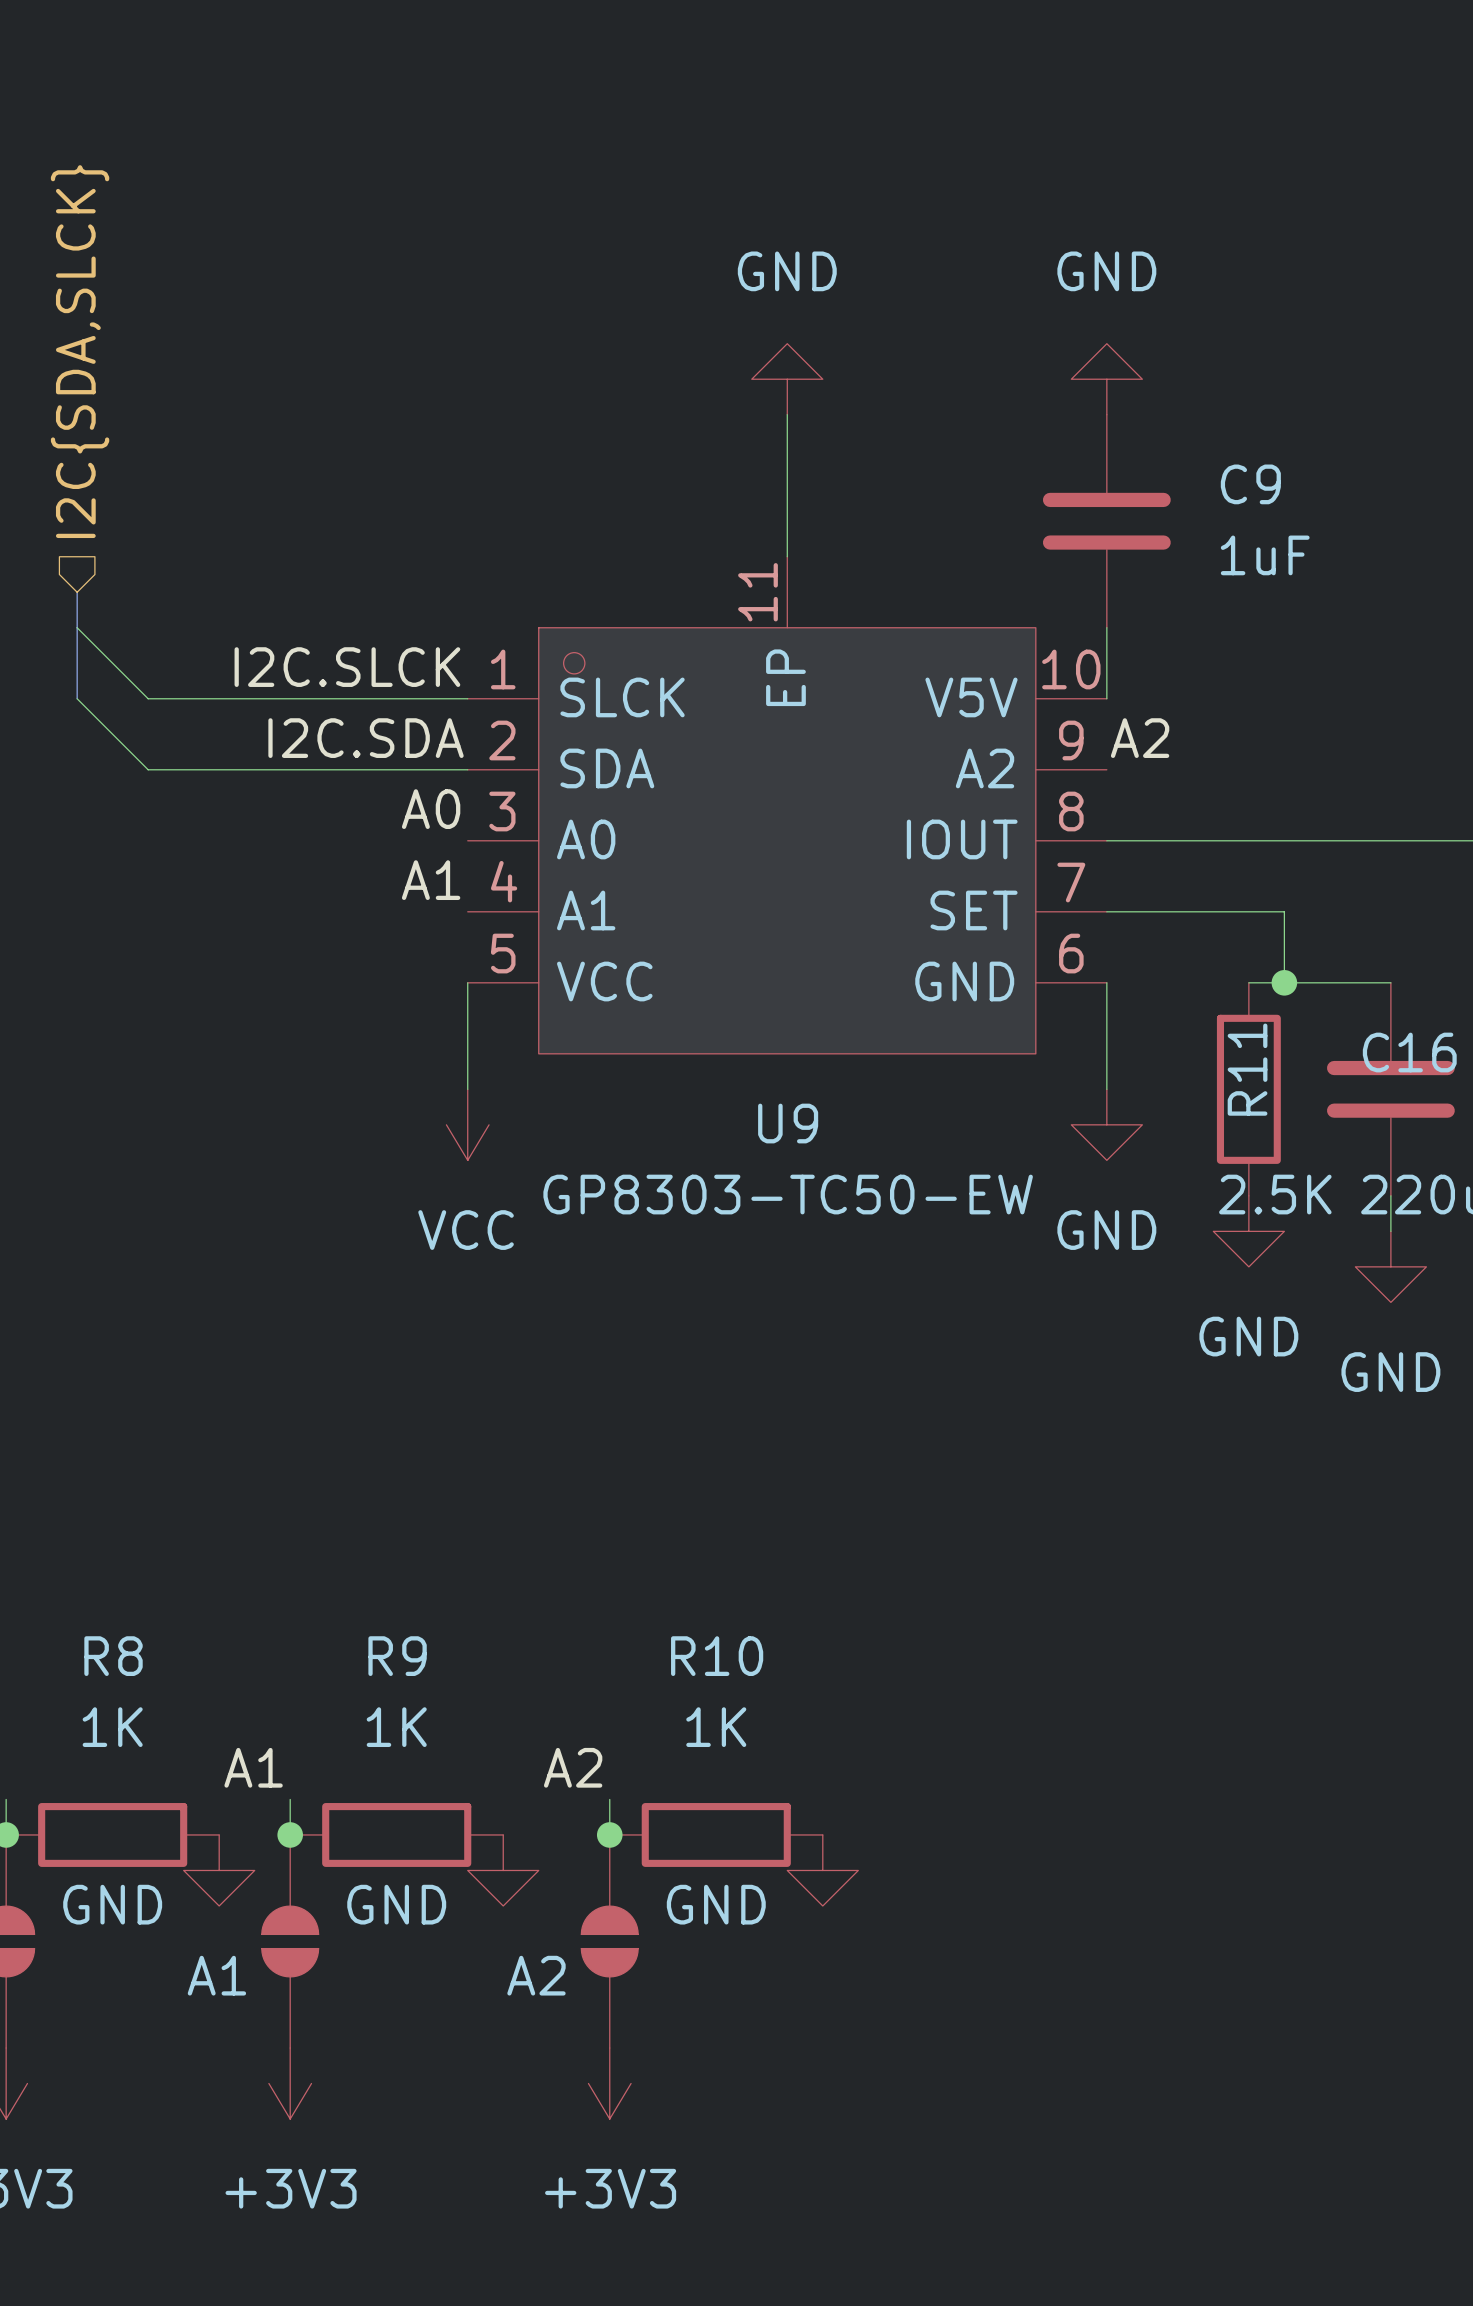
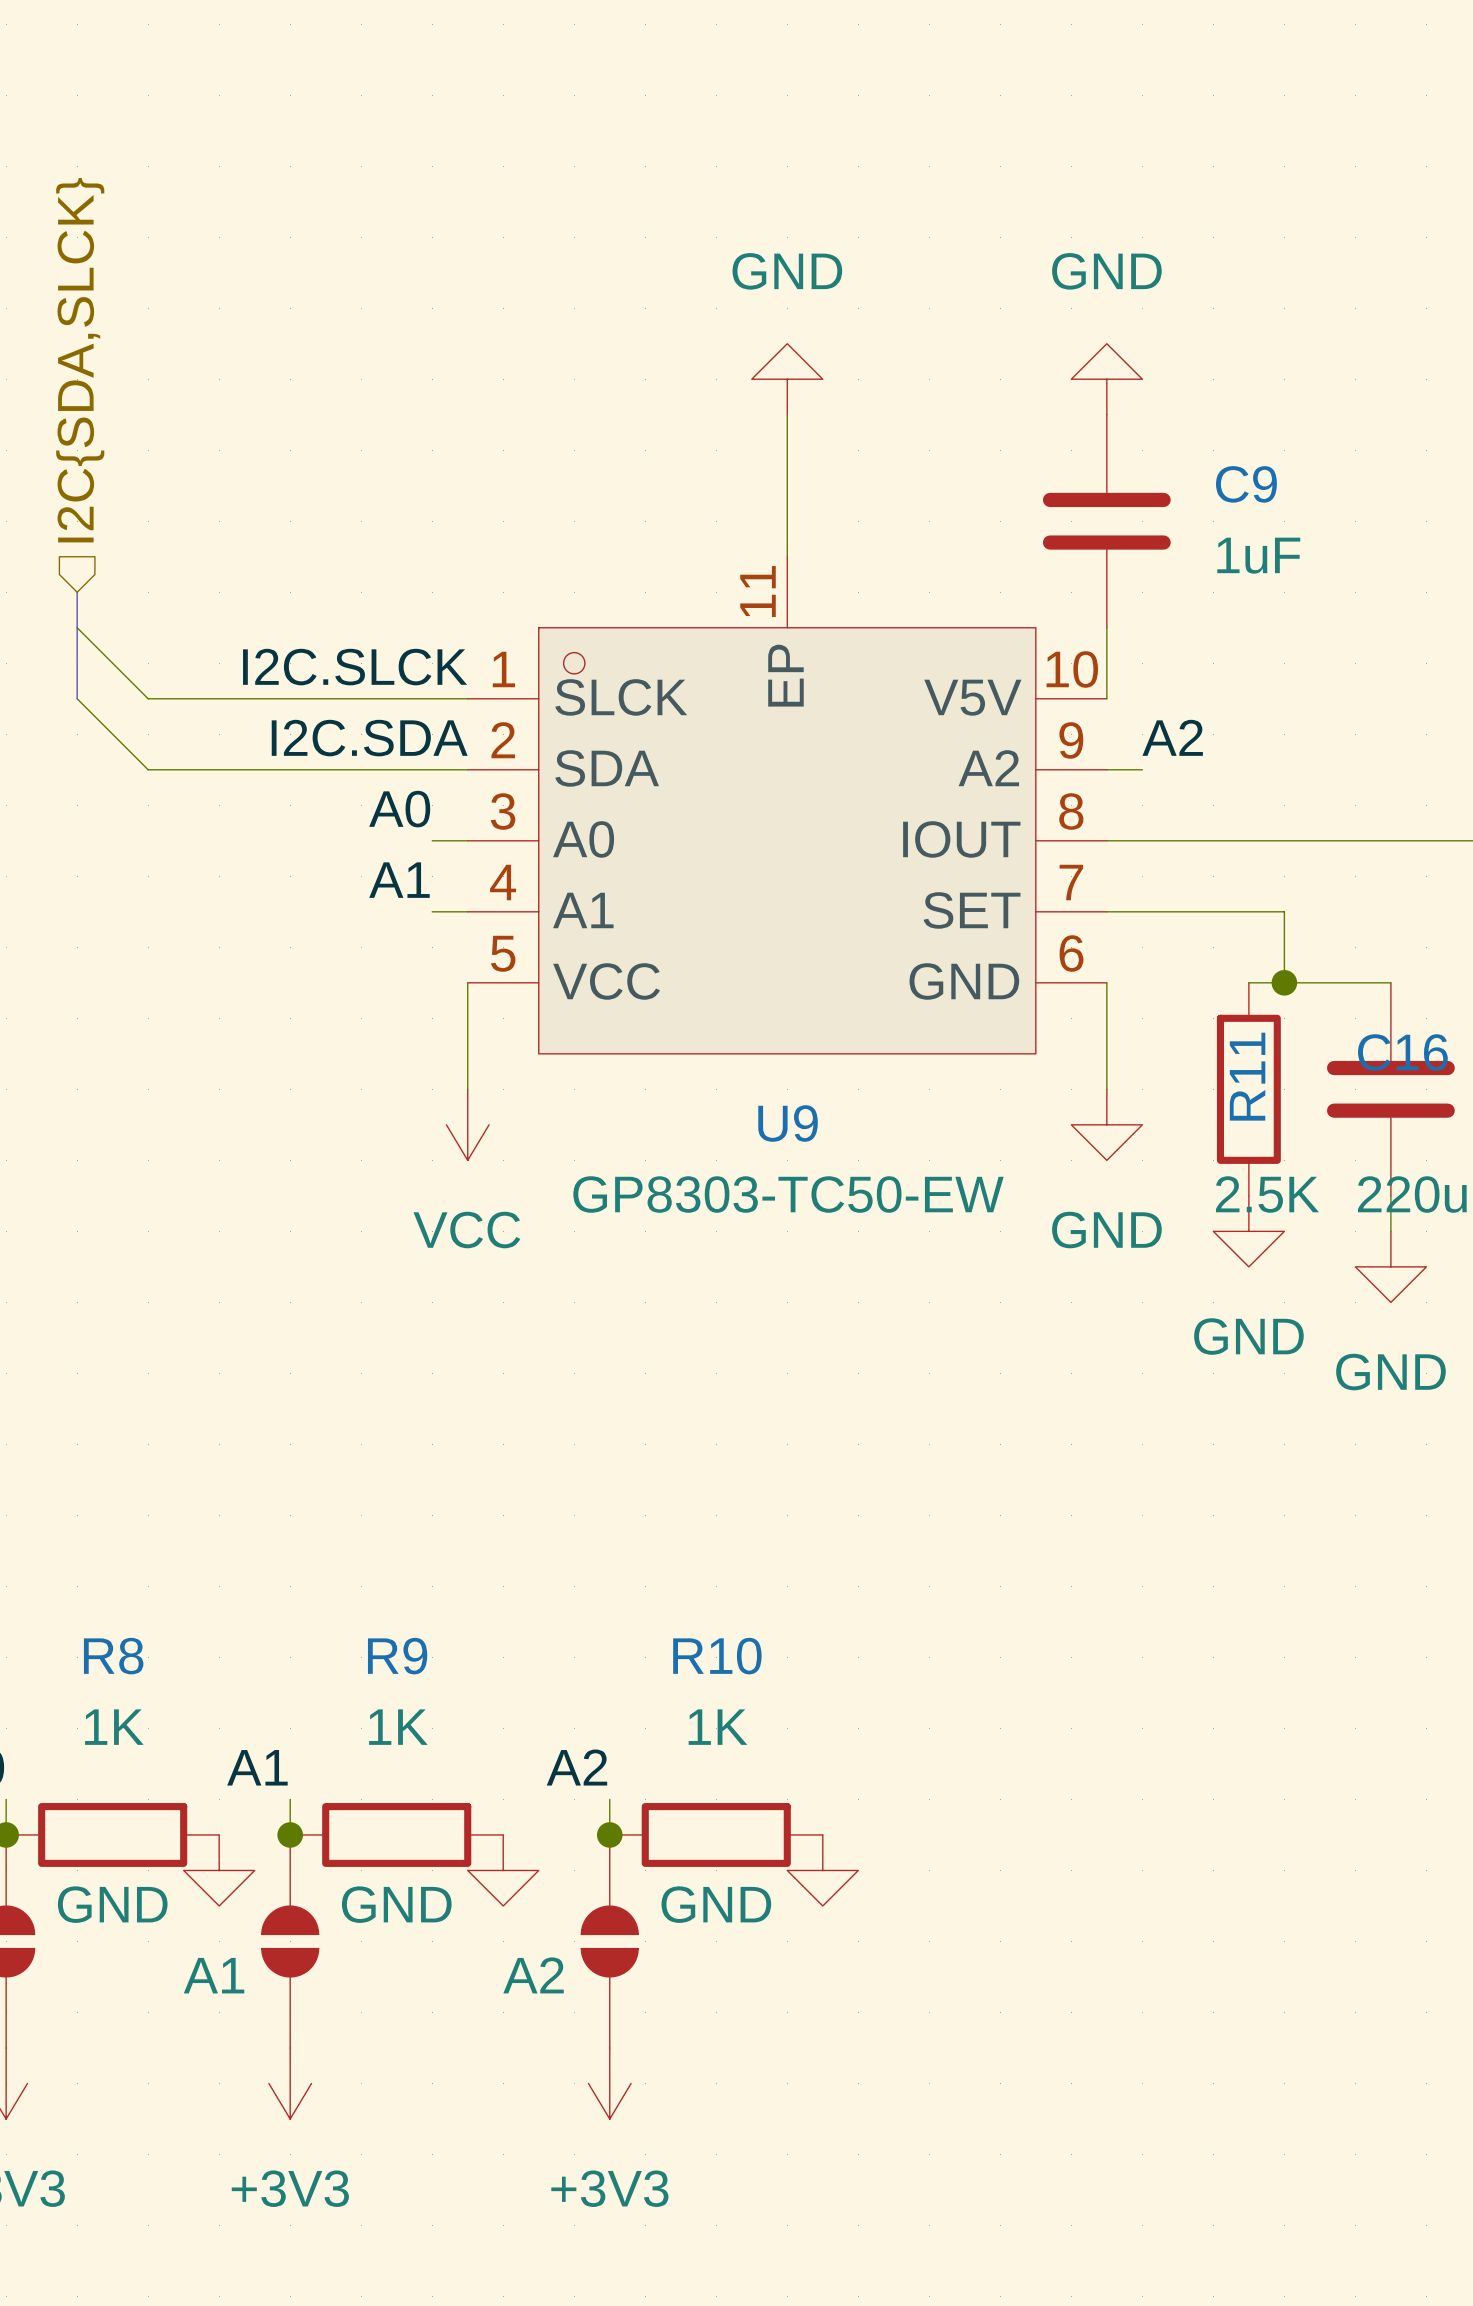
label position: A2 (1140, 738) -> A2 (1172, 737)
wire: none -> (1106, 769) (1142, 769)
label position: A0 (431, 809) -> A0 (399, 809)
wire: none -> (432, 840) (467, 840)
label position: A1 (431, 880) -> A1 (399, 880)
wire: none -> (432, 911) (467, 911)

